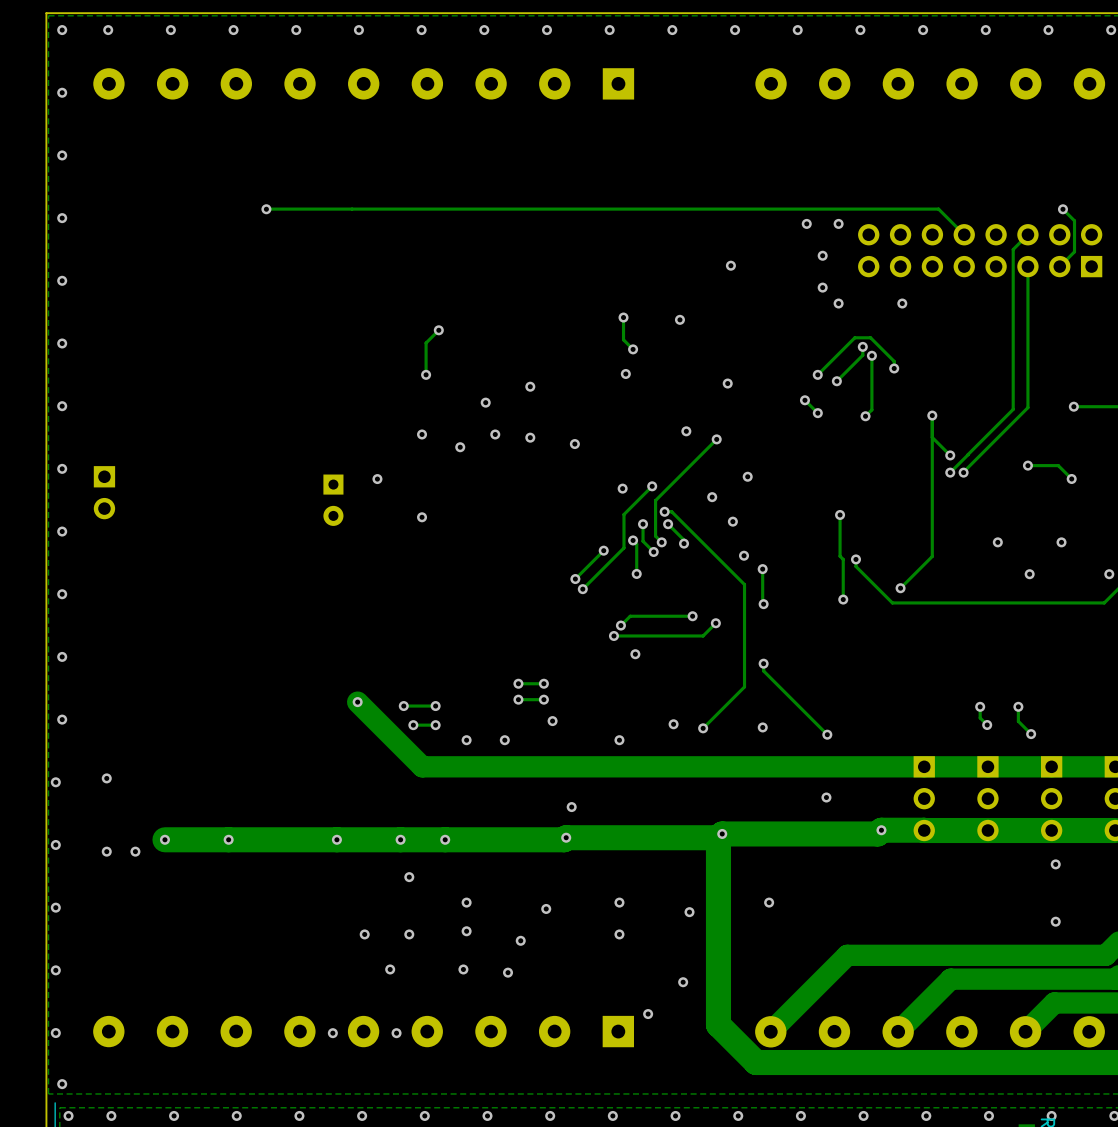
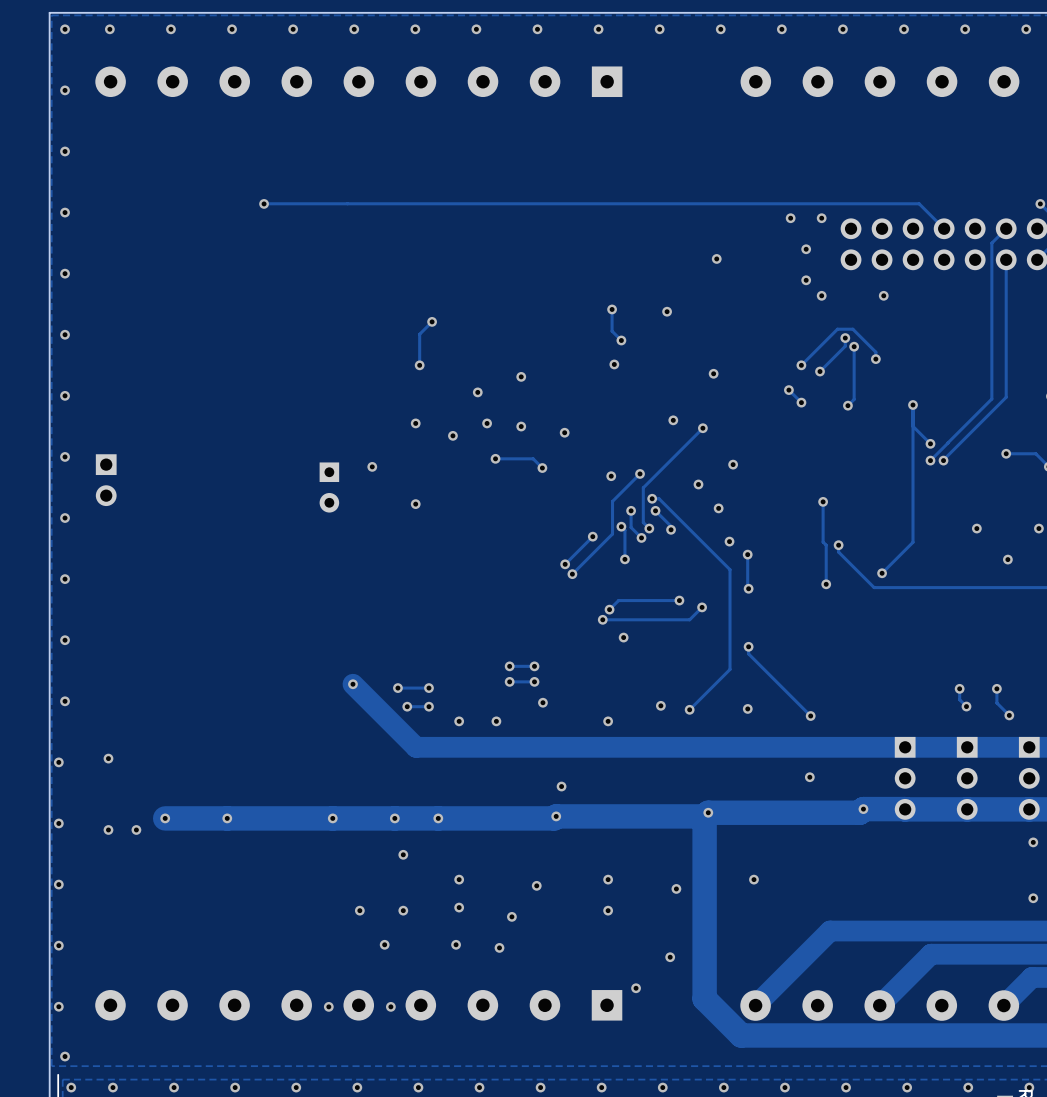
track: none -> (495, 458) (533, 458) (542, 468)
via: none -> (495, 458)
via: none -> (542, 468)

